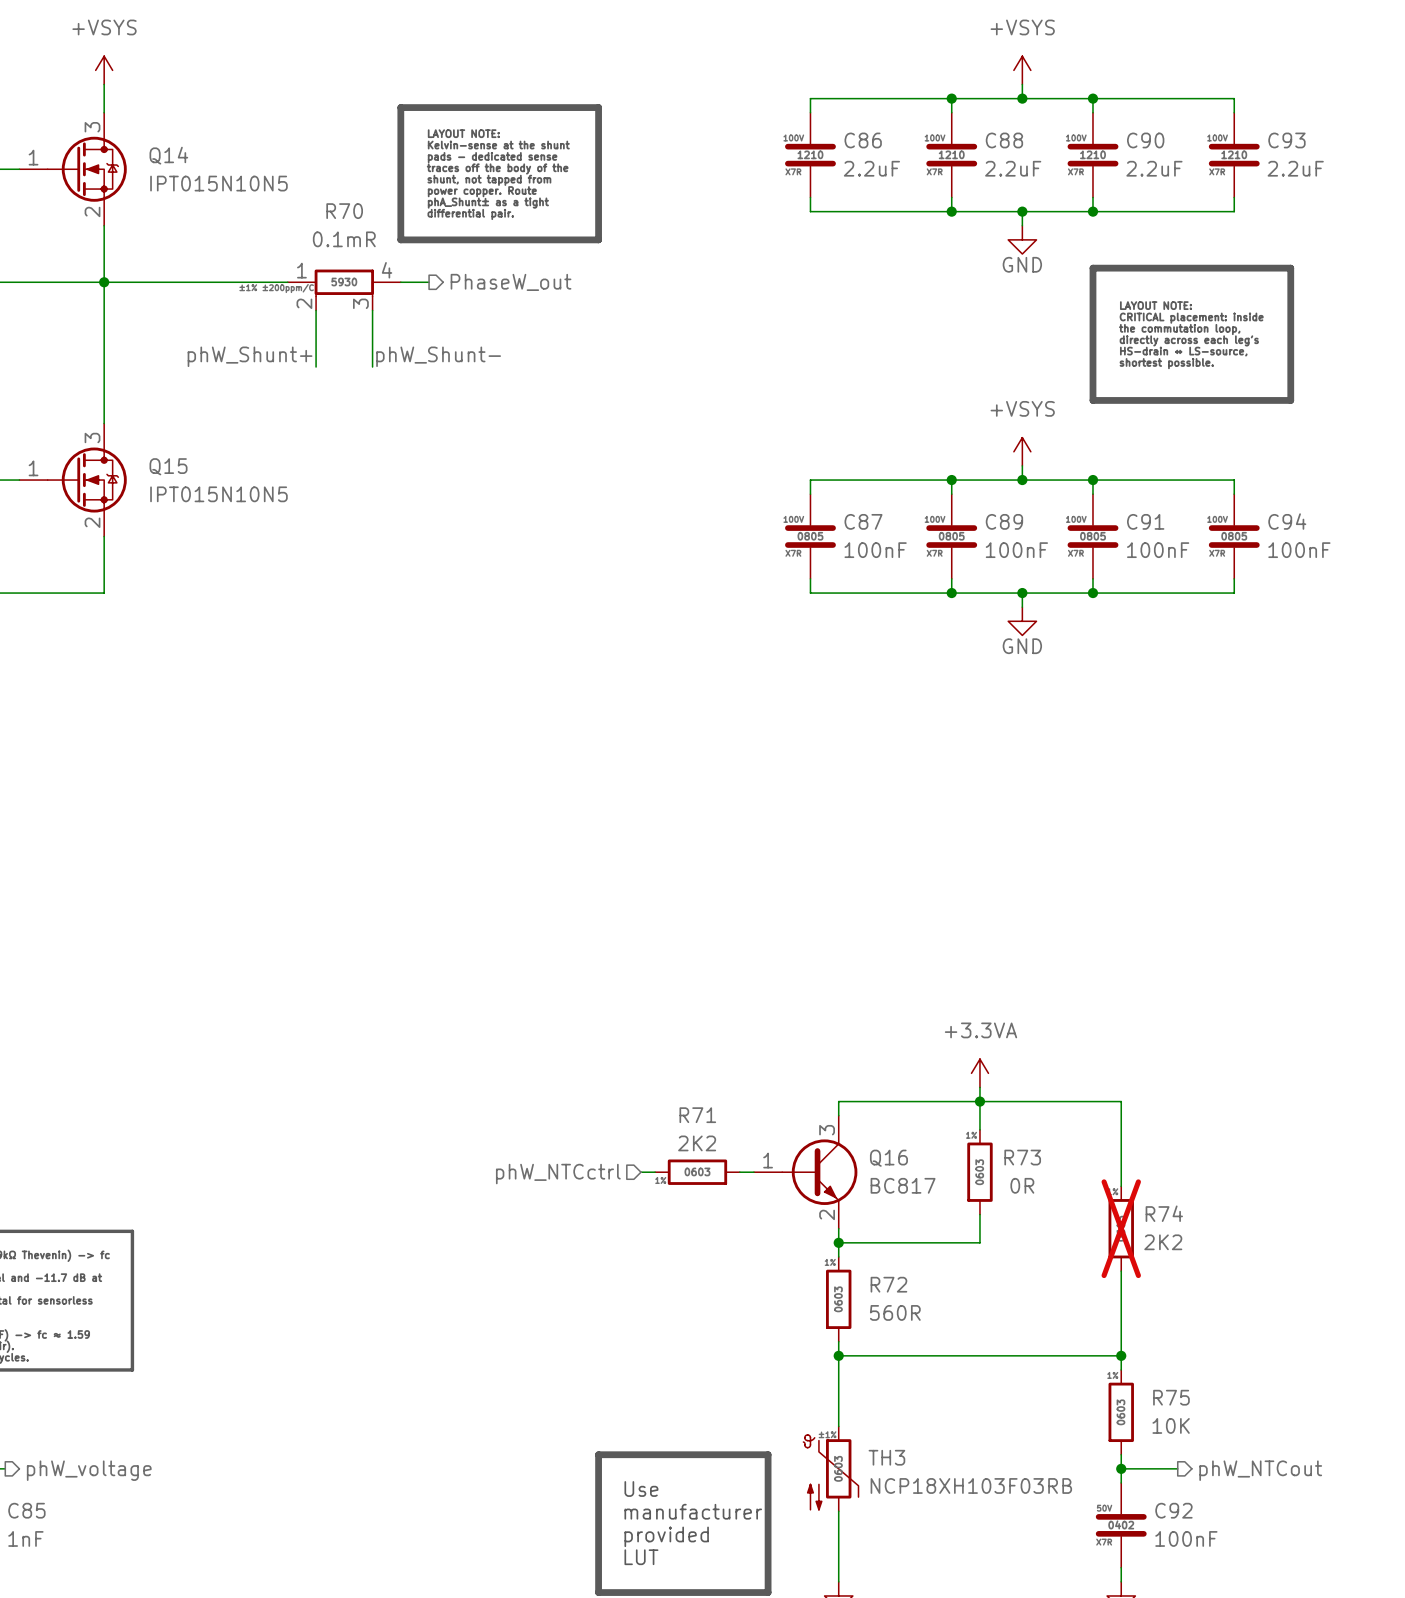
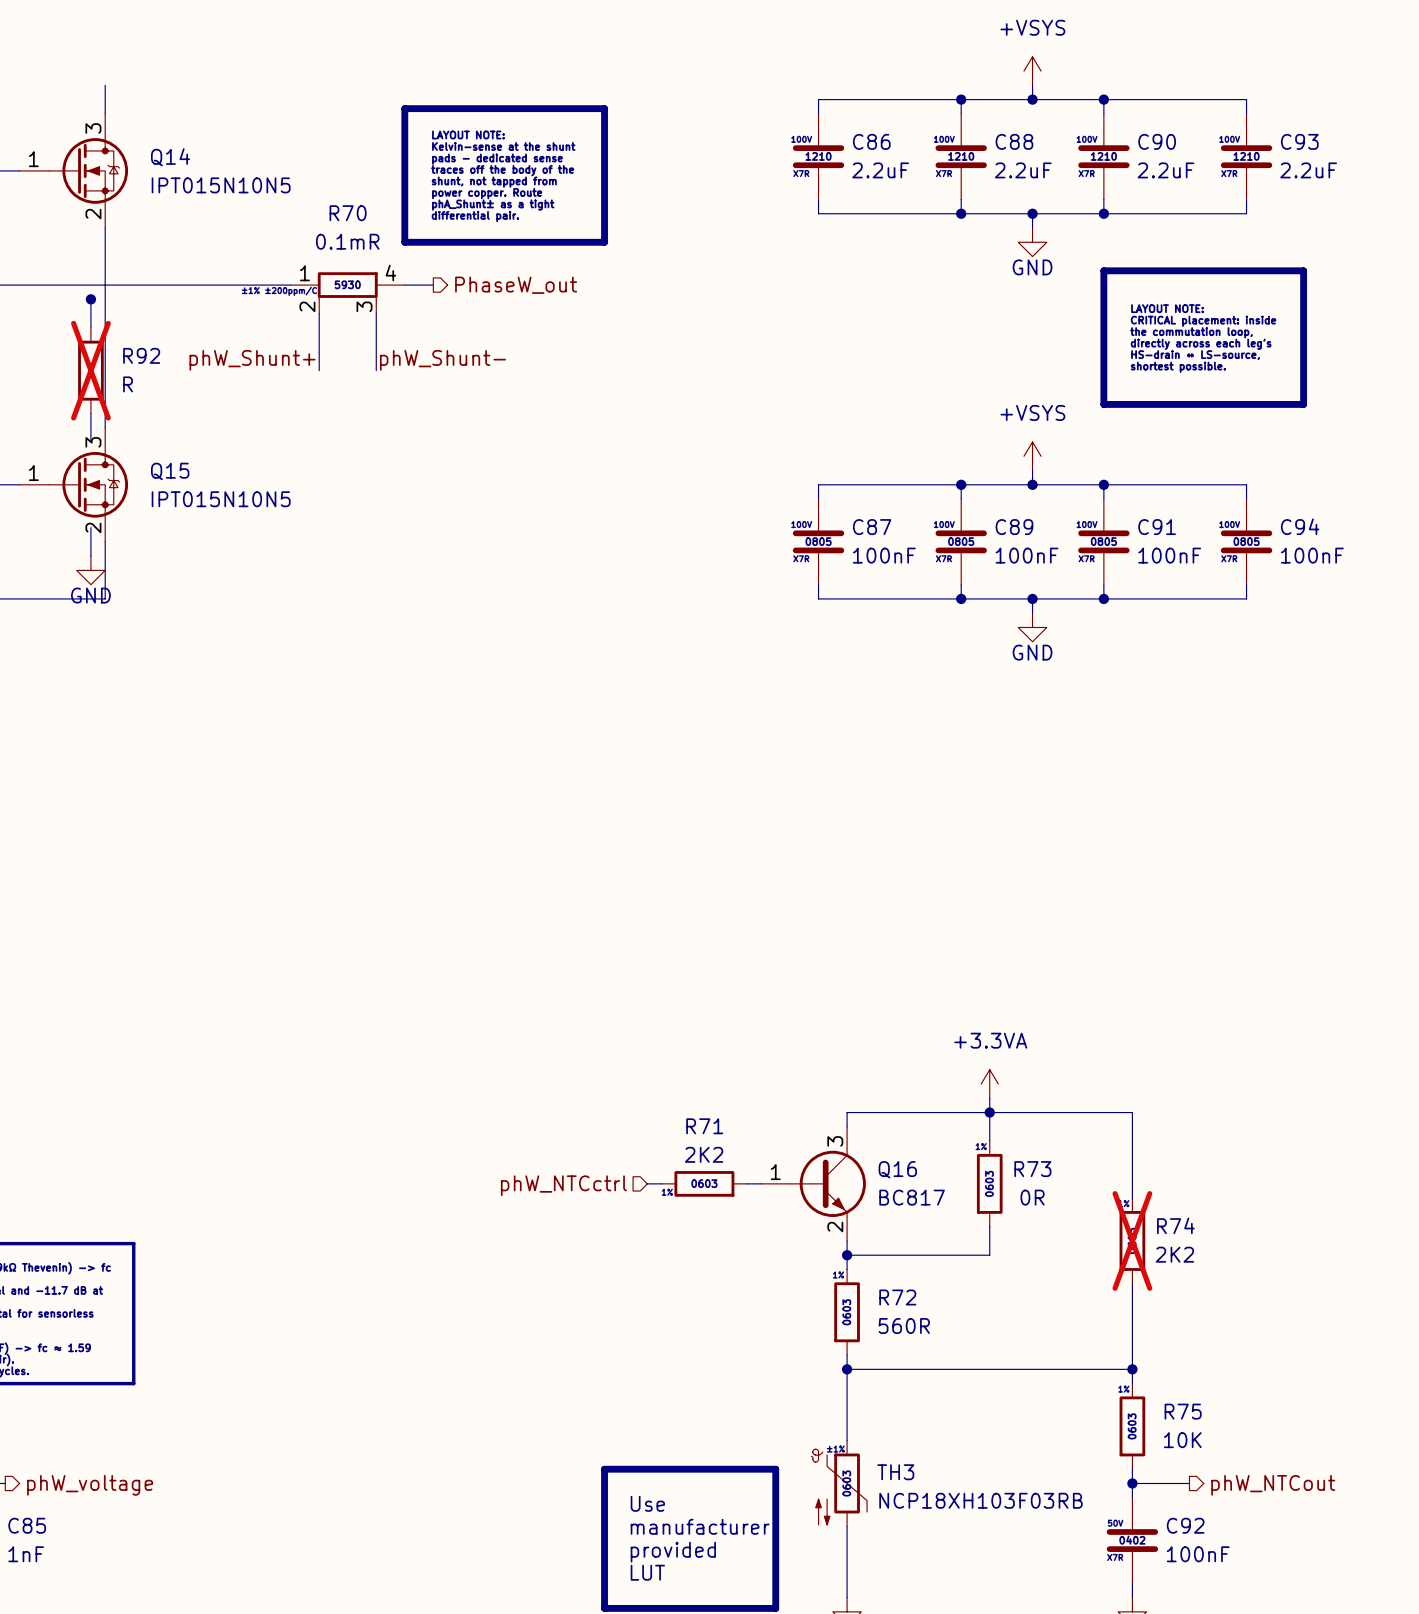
power symbol: +VSYS (104, 70) -> none
junction position: (104, 282) -> (90, 299)
wire: none -> (90, 299) (90, 327)
R92: none -> R (90, 370)
wire: none -> (90, 413) (90, 442)
wire: none -> (90, 527) (90, 556)
power symbol: none -> GND (90, 570)

